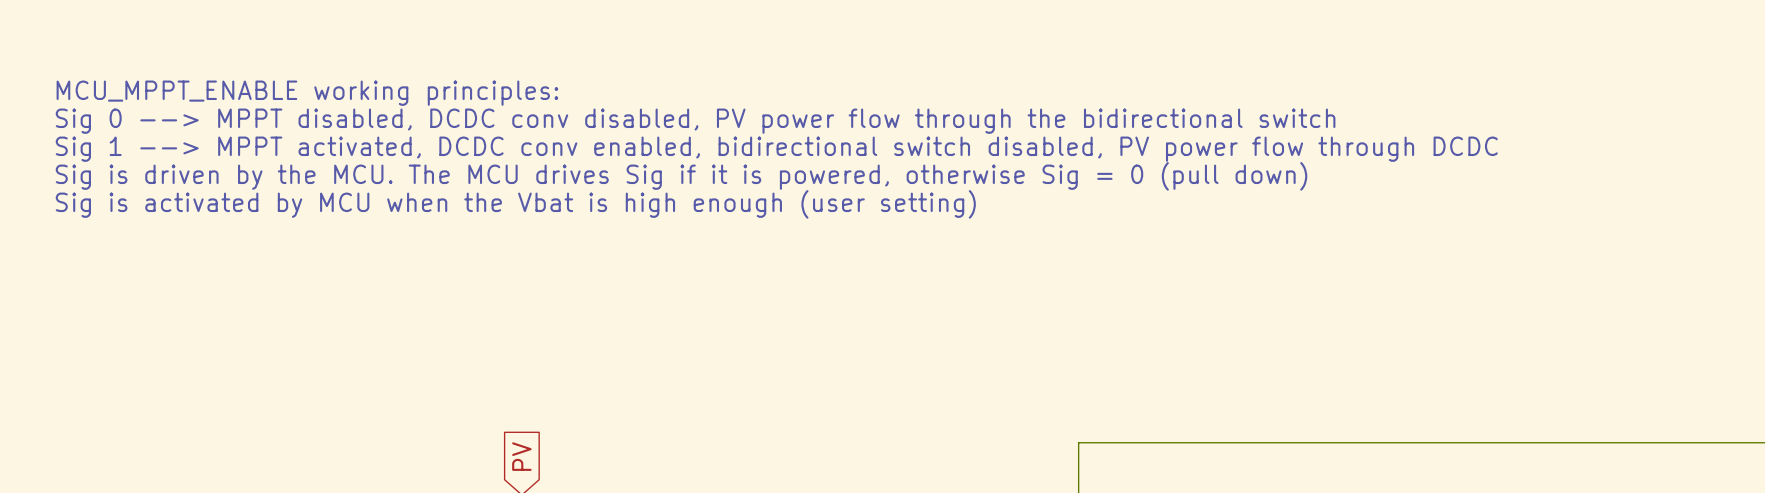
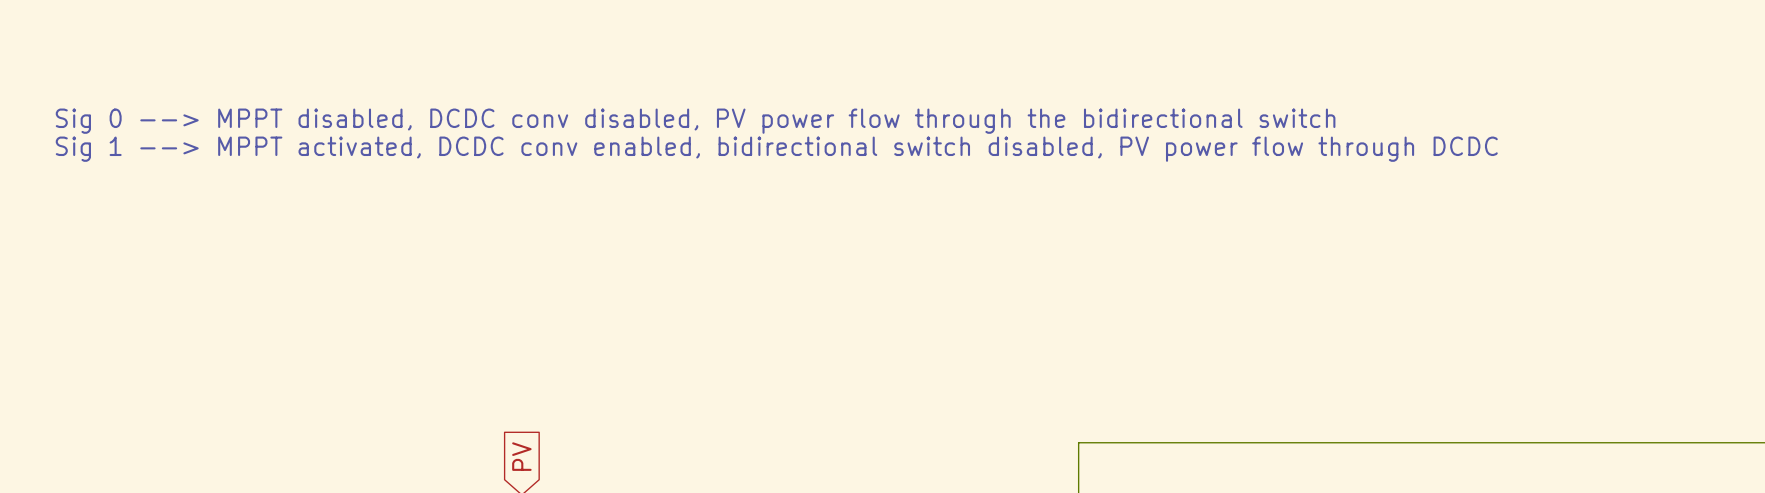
text: MCU_MPPT_ENABLE working principles: (307, 93) -> none
text: Sig is driven by the MCU. The MCU drives Sig if it is powered, otherwise Sig = 0 (pull down) (681, 176) -> none
text: Sig is activated by MCU when the Vbat is high enough (user setting) (515, 204) -> none

